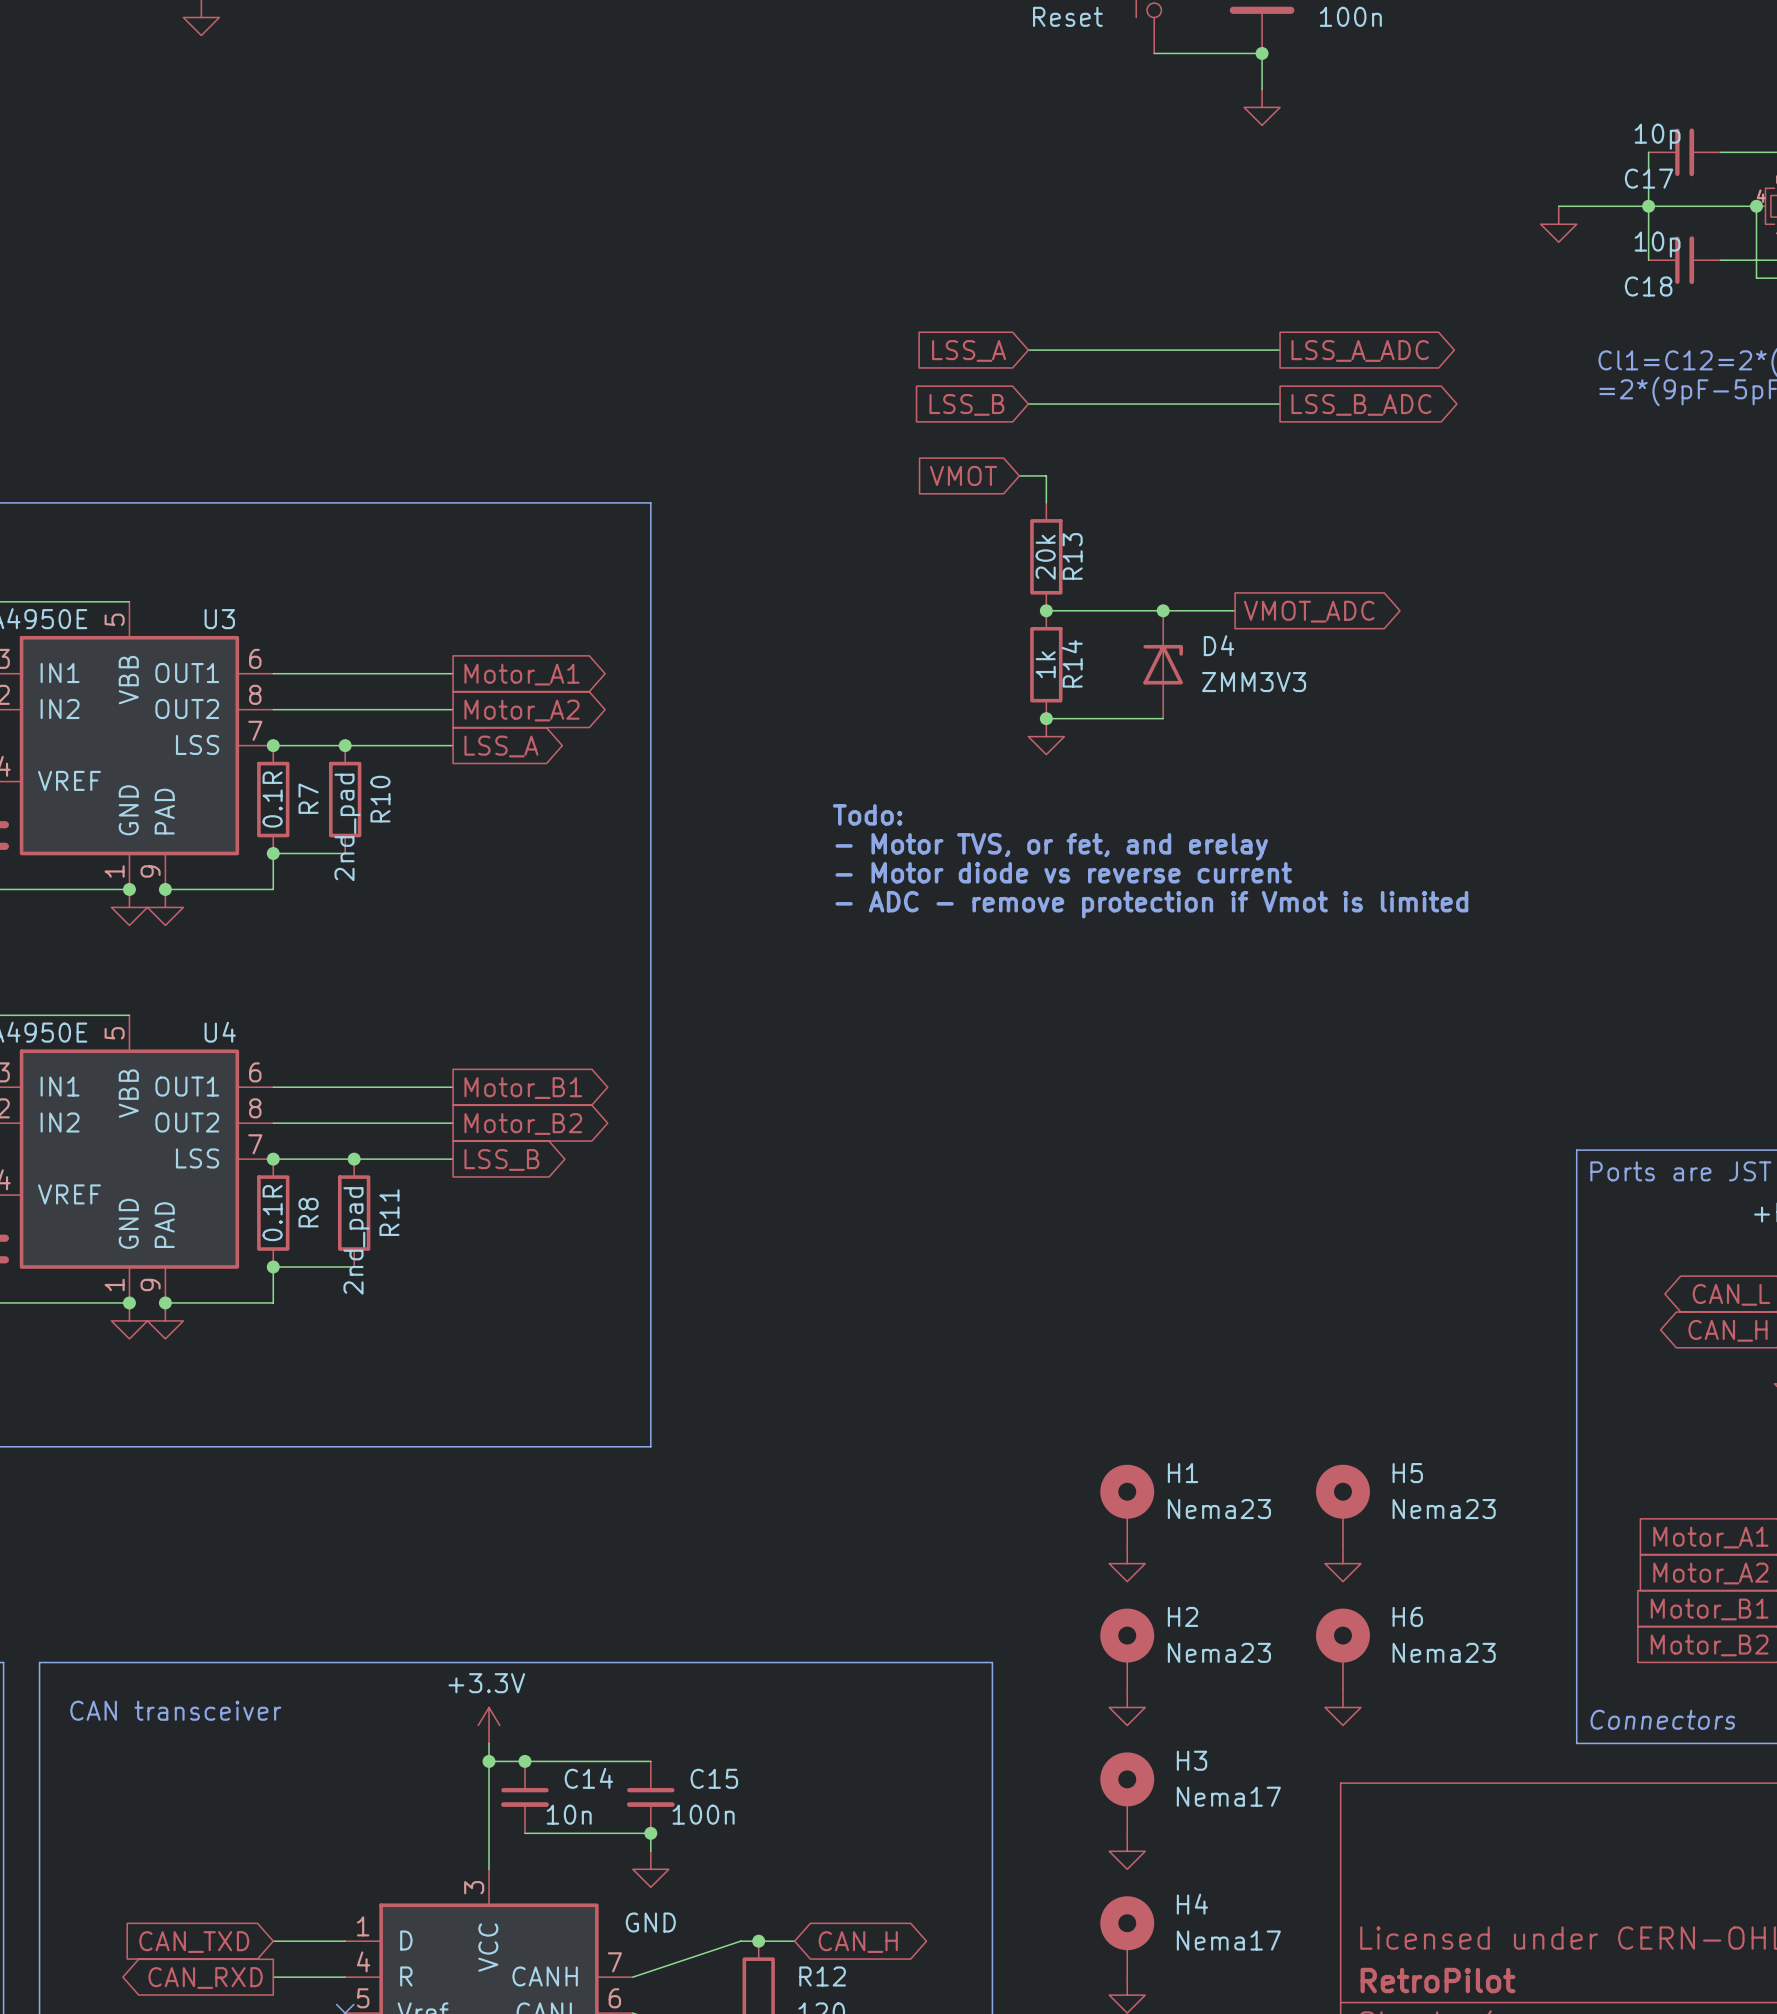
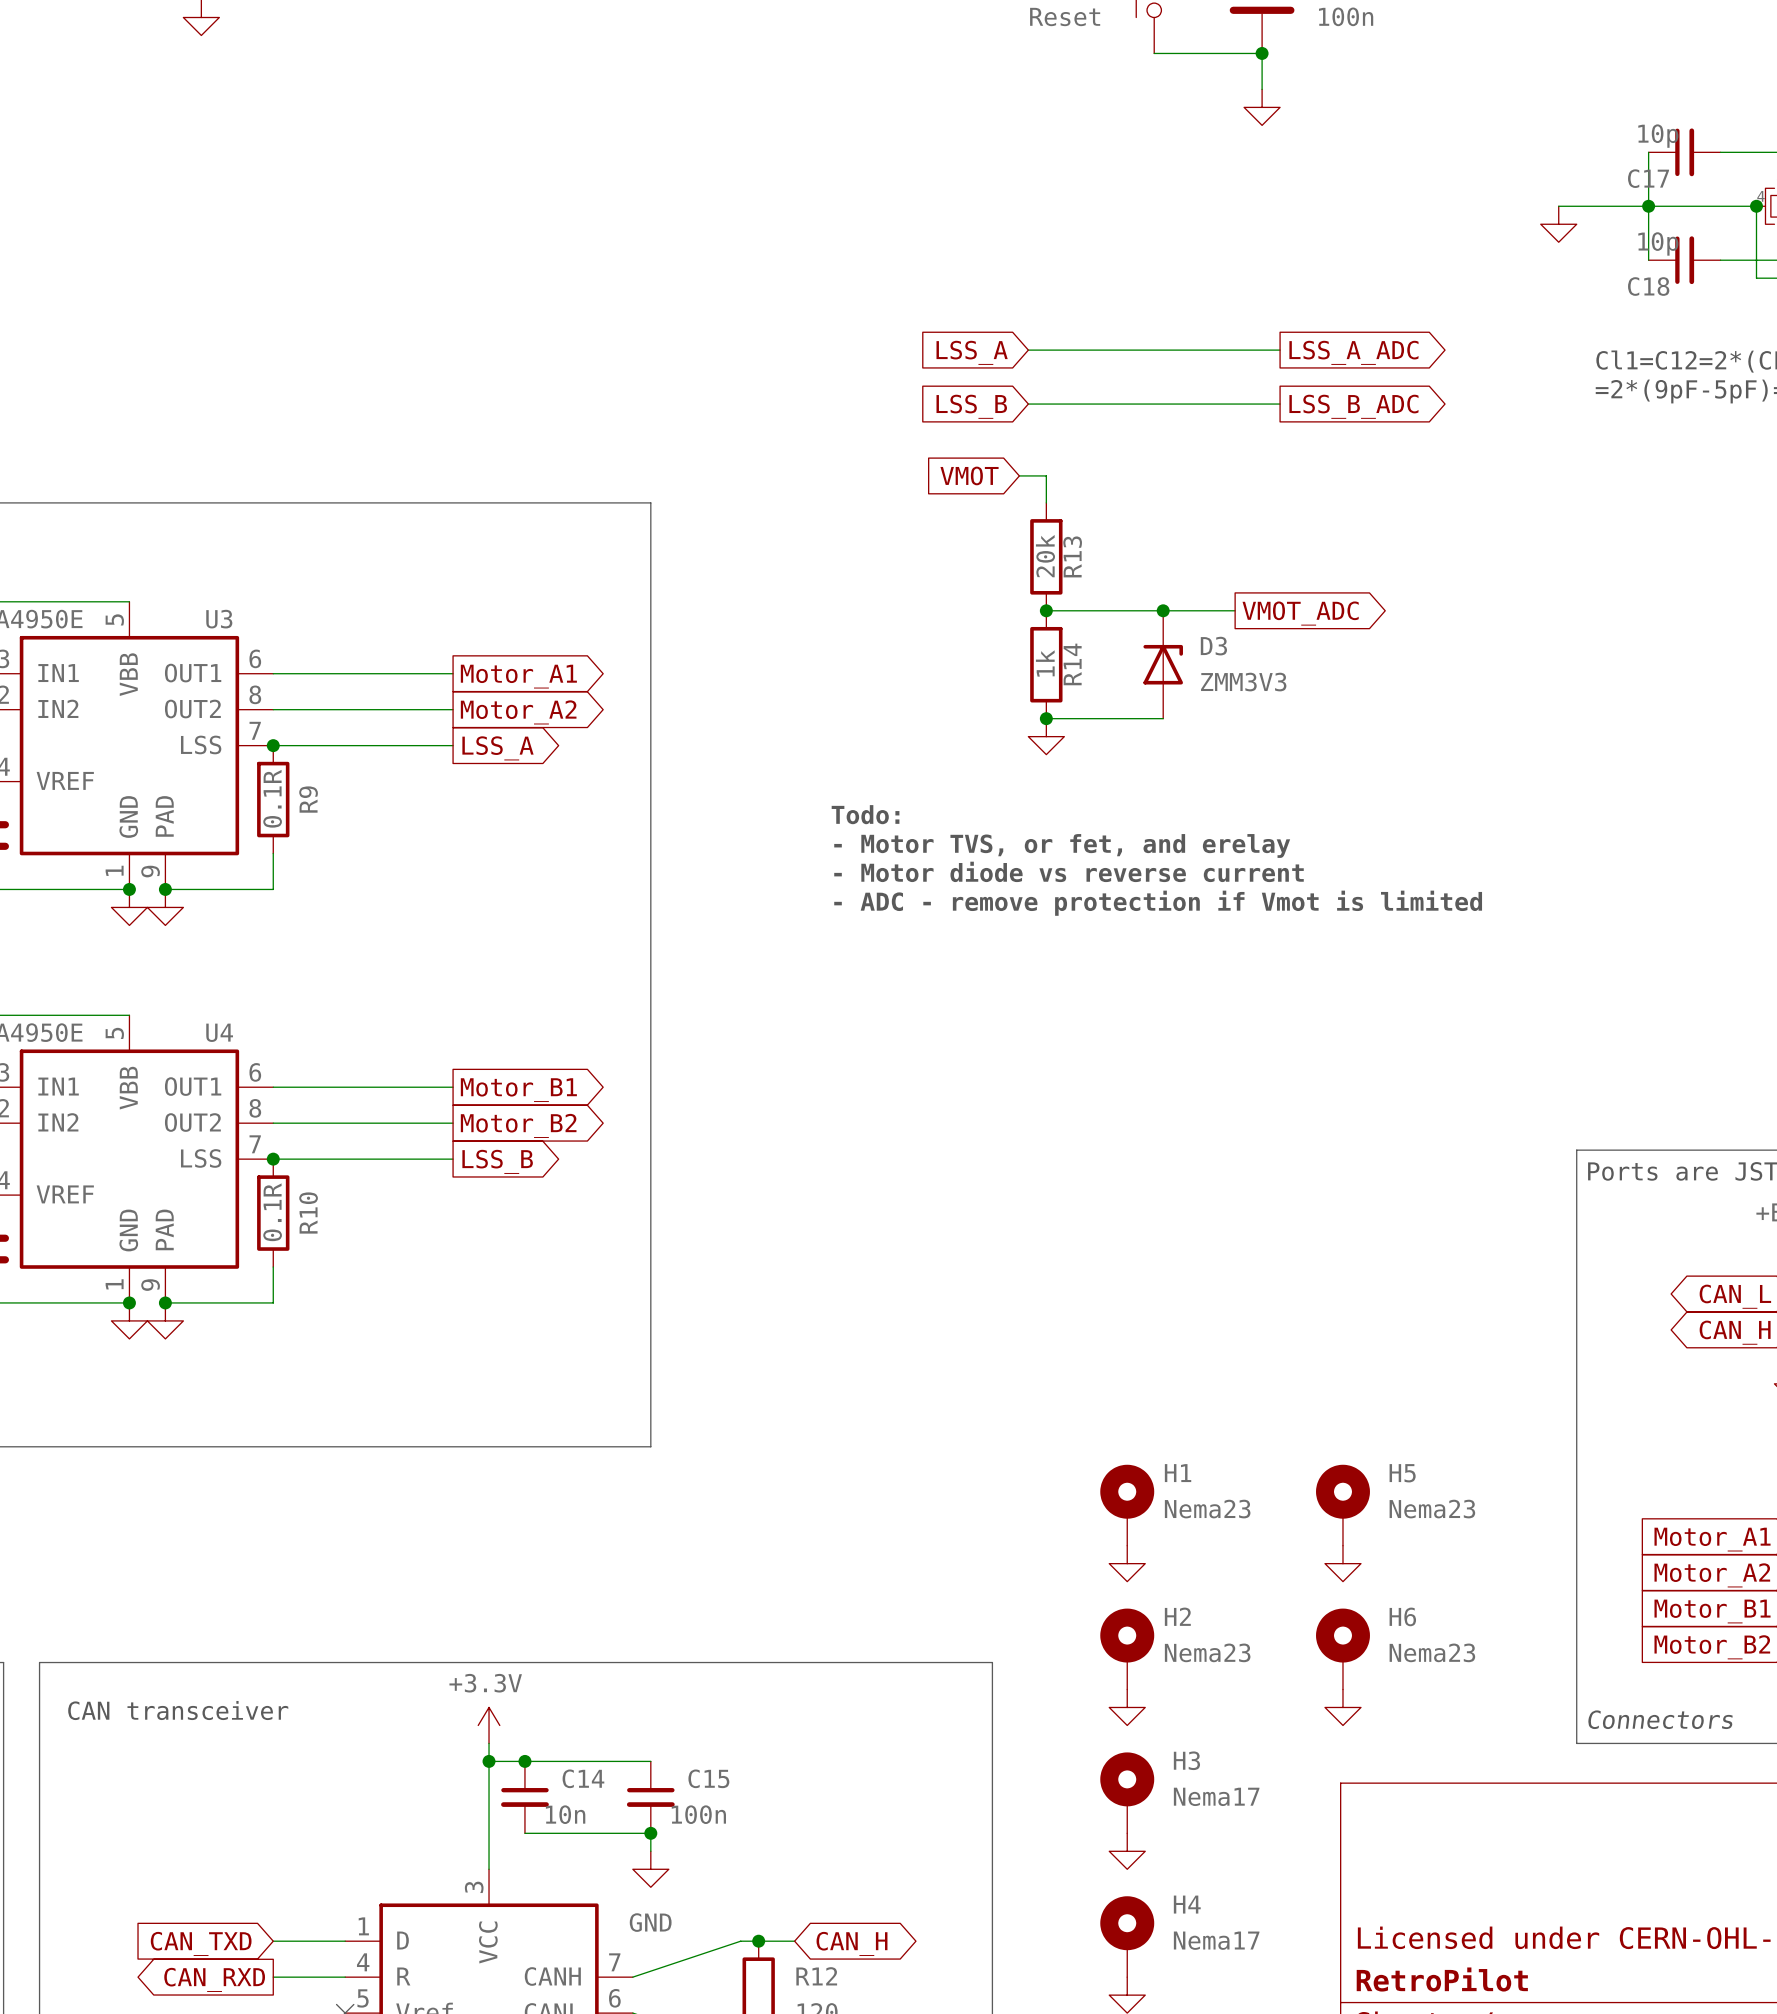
D4 name: D4 (1218, 645) -> D3 (1213, 646)
junction: (345, 745) -> none
R7 name: R7 (308, 798) -> R9 (308, 799)
R10: 2nd_pad (345, 799) -> none
wire: (273, 853) (345, 853) -> none
junction: (273, 853) -> none
junction: (354, 1159) -> none
R8 name: R8 (308, 1212) -> R10 (308, 1213)
R11: 2nd_pad (354, 1213) -> none
wire: (273, 1267) (354, 1267) -> none
junction: (273, 1267) -> none

